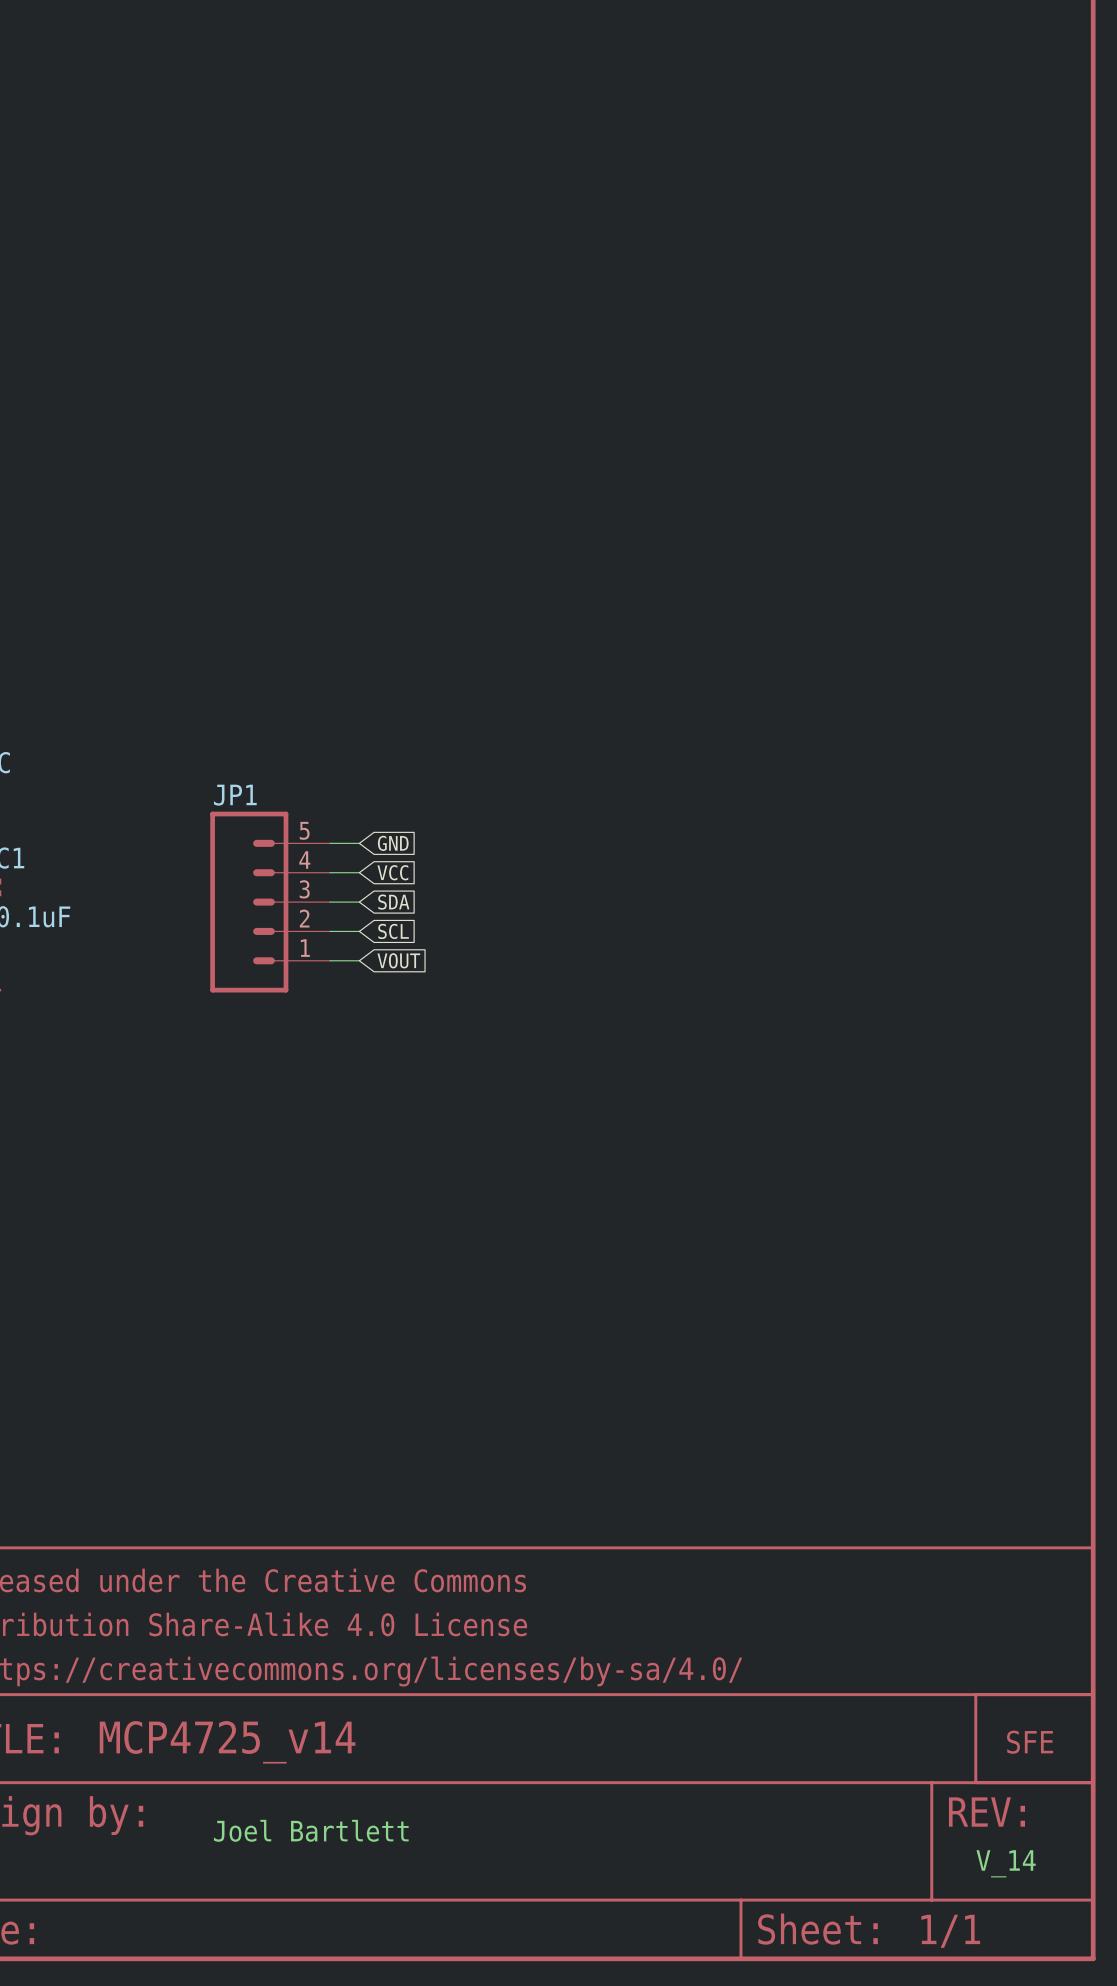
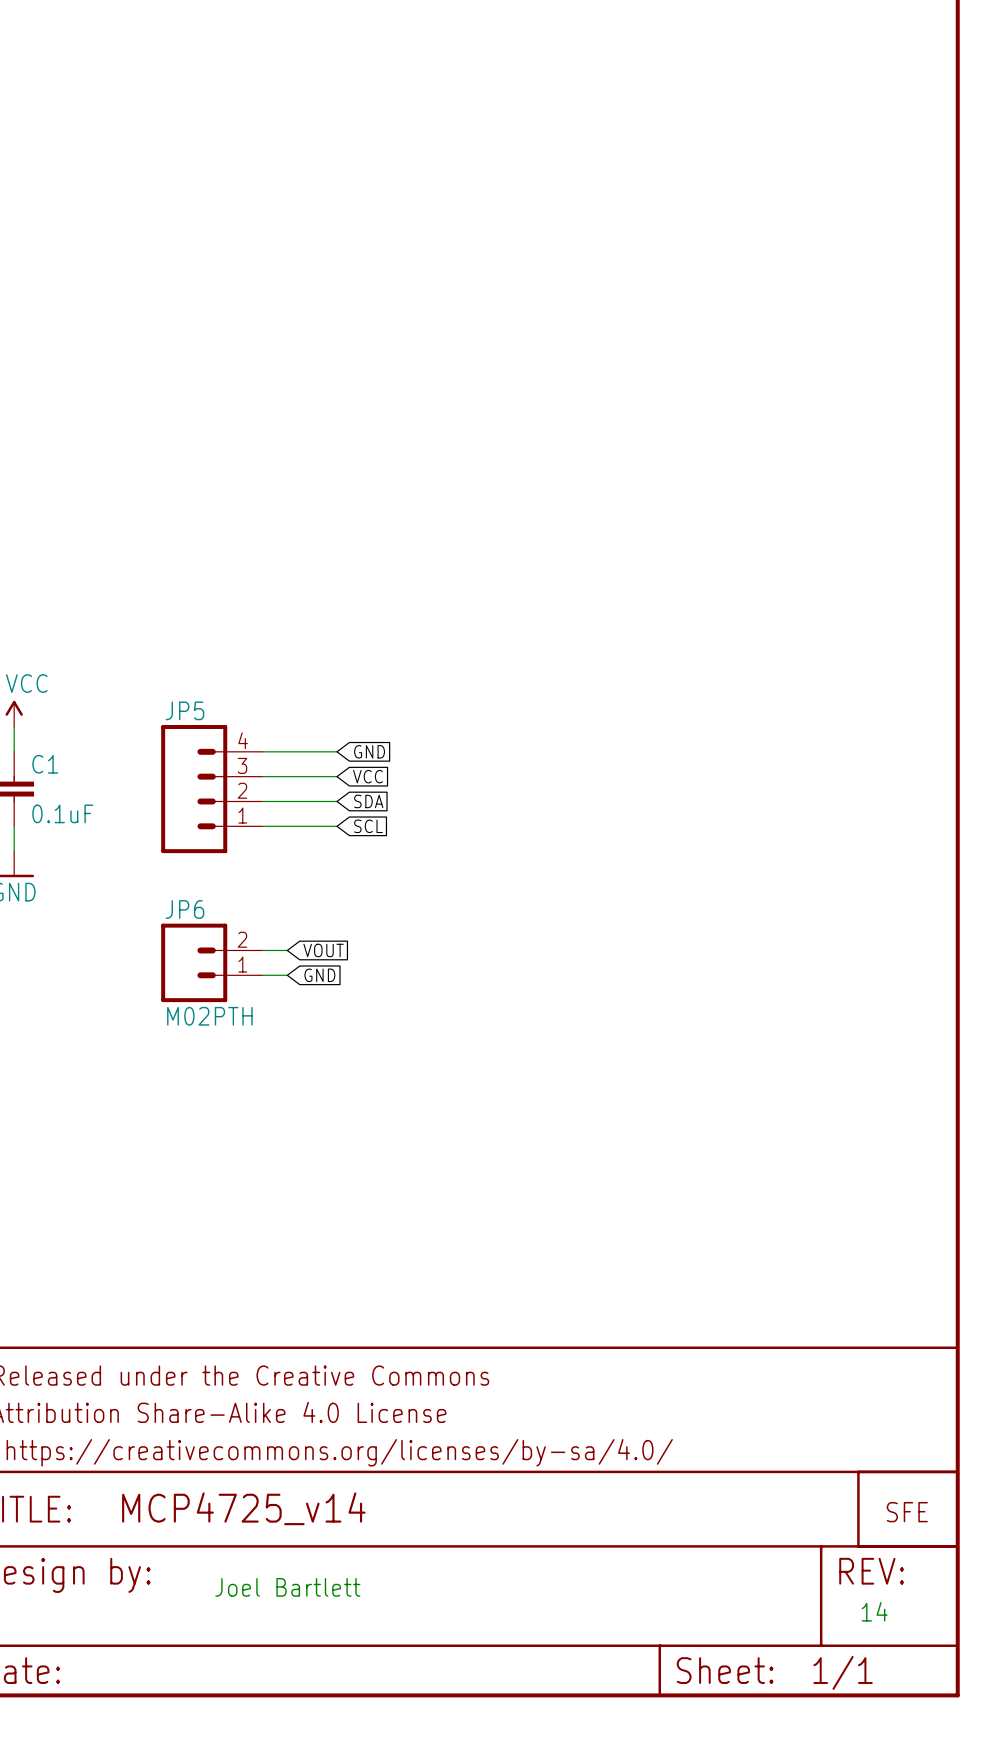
JP5: none -> (211, 789)
JP1: (270, 902) -> none
wire: (330, 960) (359, 960) -> (262, 950) (287, 950)
global label position: VOUT (398, 960) -> VOUT (323, 950)
JP6: none -> M02PTH (211, 962)
wire: none -> (262, 975) (287, 975)
global label: none -> GND (319, 975)
text: V_14 (1006, 1863) -> 14 (874, 1611)

